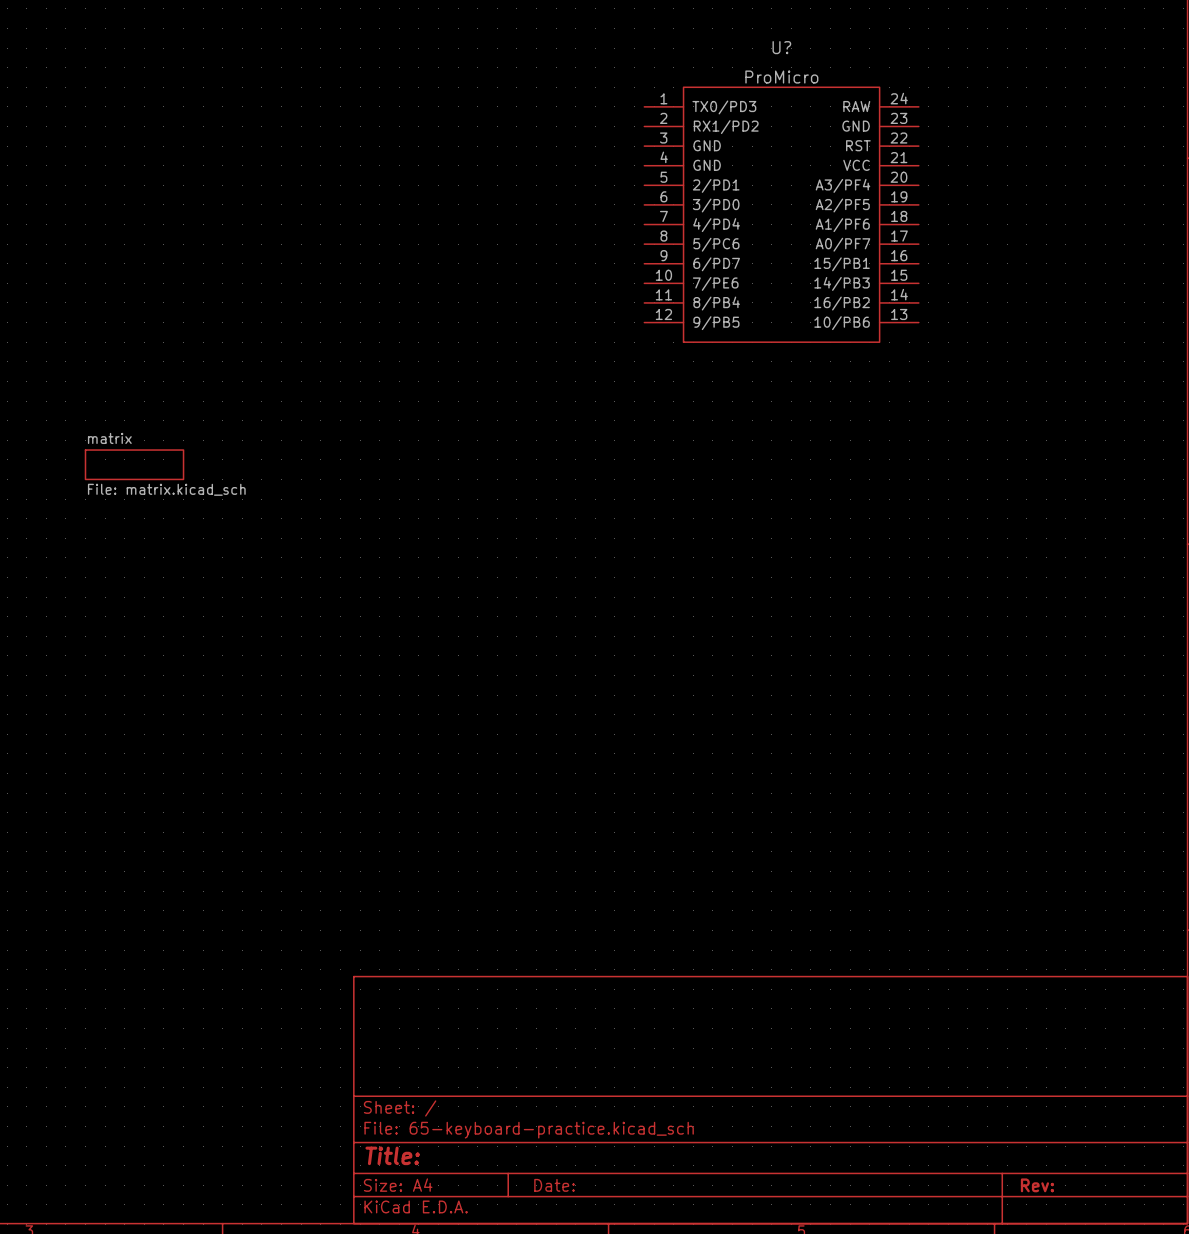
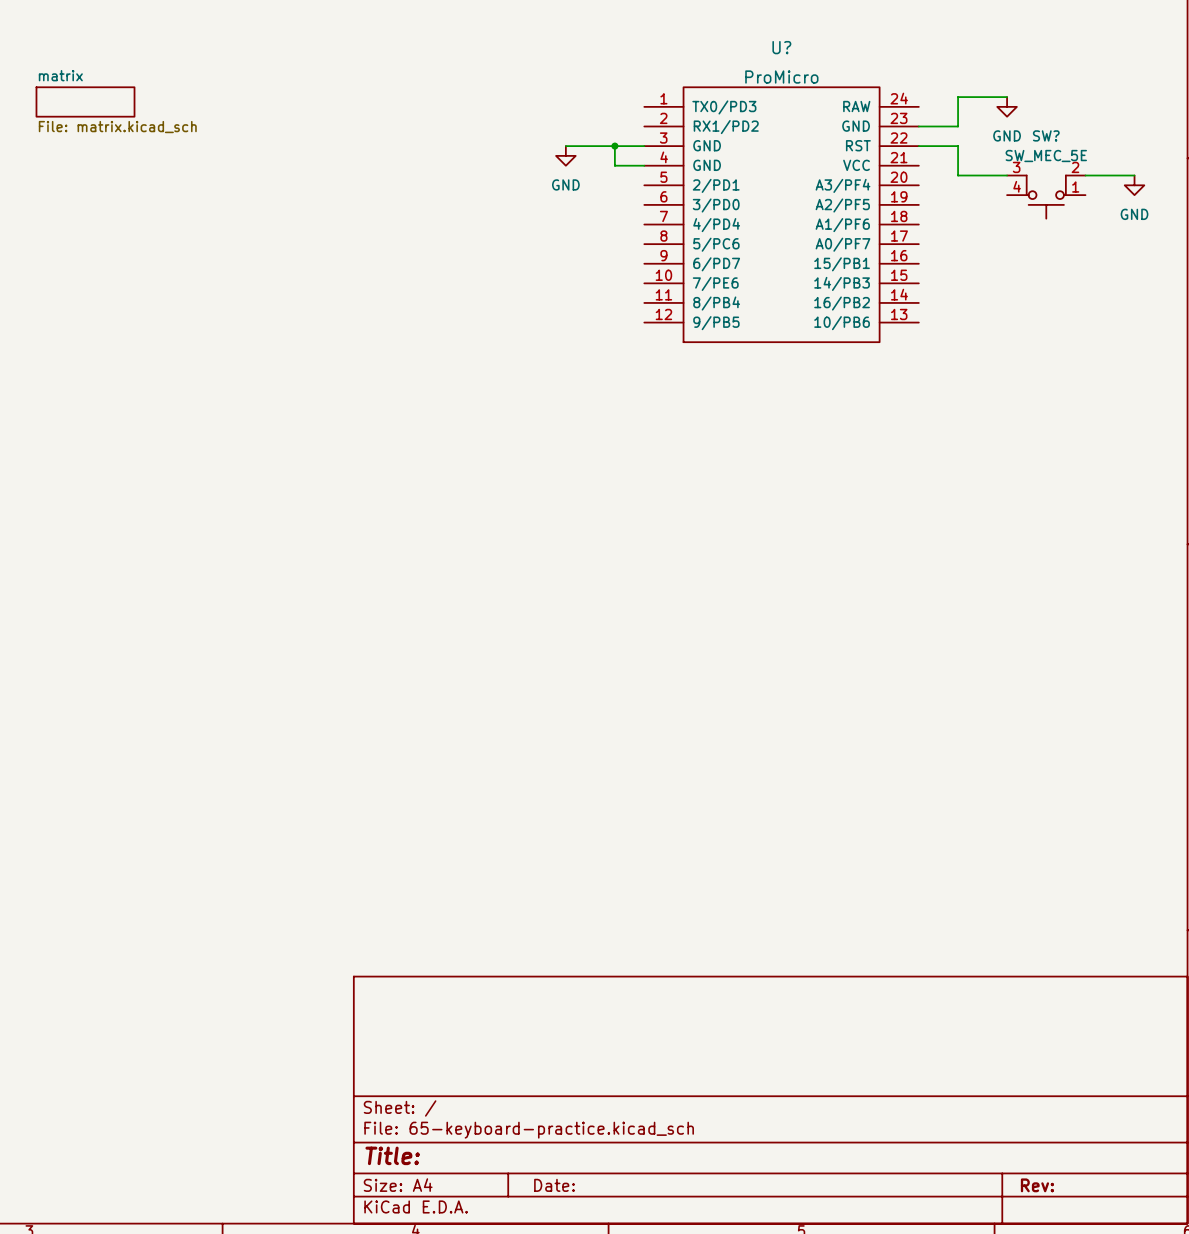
wire: none -> (1007, 97) (958, 97) (958, 126) (918, 126)
sheet matrix: none -> File: matrix.kicad_sch (85, 101)
power symbol: none -> GND (1007, 106)
wire: none -> (565, 146) (644, 146)
wire: none -> (614, 146) (614, 165) (644, 165)
junction: none -> (614, 146)
wire: none -> (918, 146) (958, 146) (958, 175) (1007, 175)
power symbol: none -> GND (565, 155)
wire: none -> (1085, 175) (1134, 175)
power symbol: none -> GND (1134, 185)
SW?: none -> SW_MEC_5E (1046, 197)
sheet matrix: File: matrix.kicad_sch (134, 464) -> none

